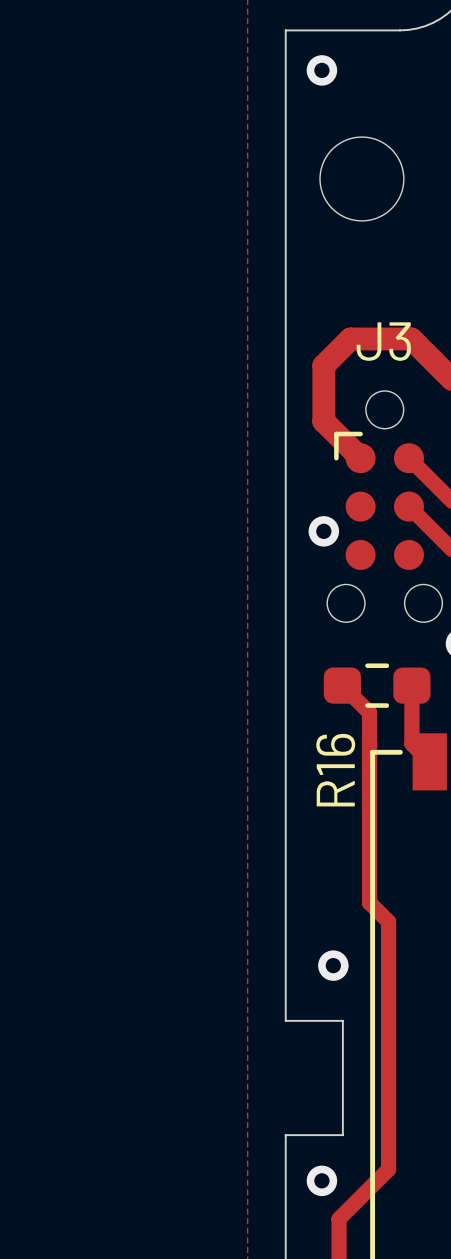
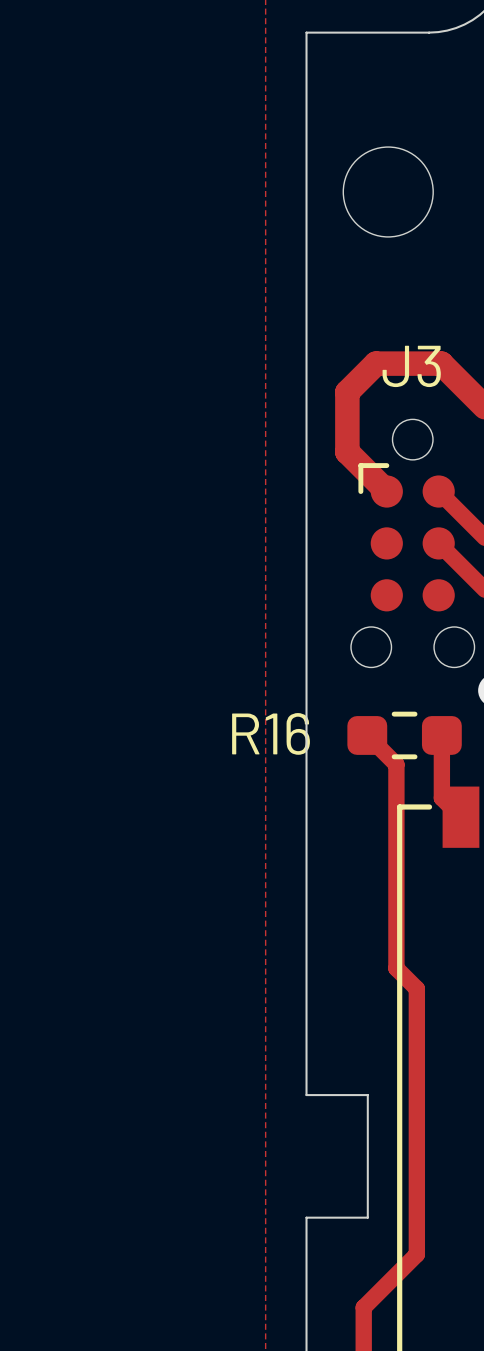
via: (321, 70) -> none
via: (323, 531) -> none
R16 name rotation: 0° (335, 770) -> 90° clockwise (271, 733)
via: (333, 965) -> none
via: (321, 1180) -> none

